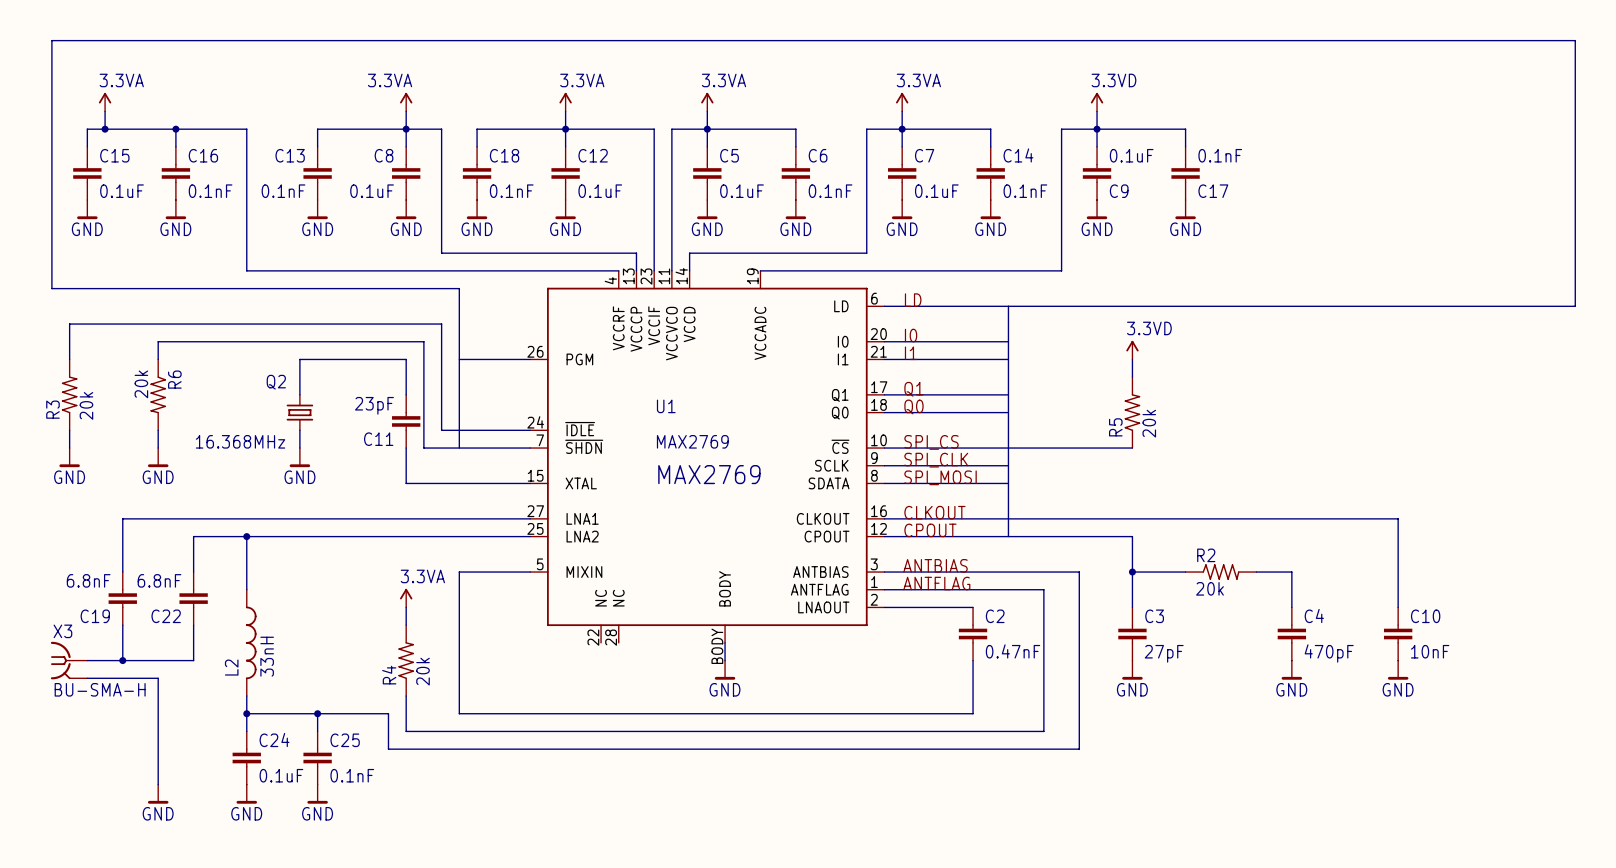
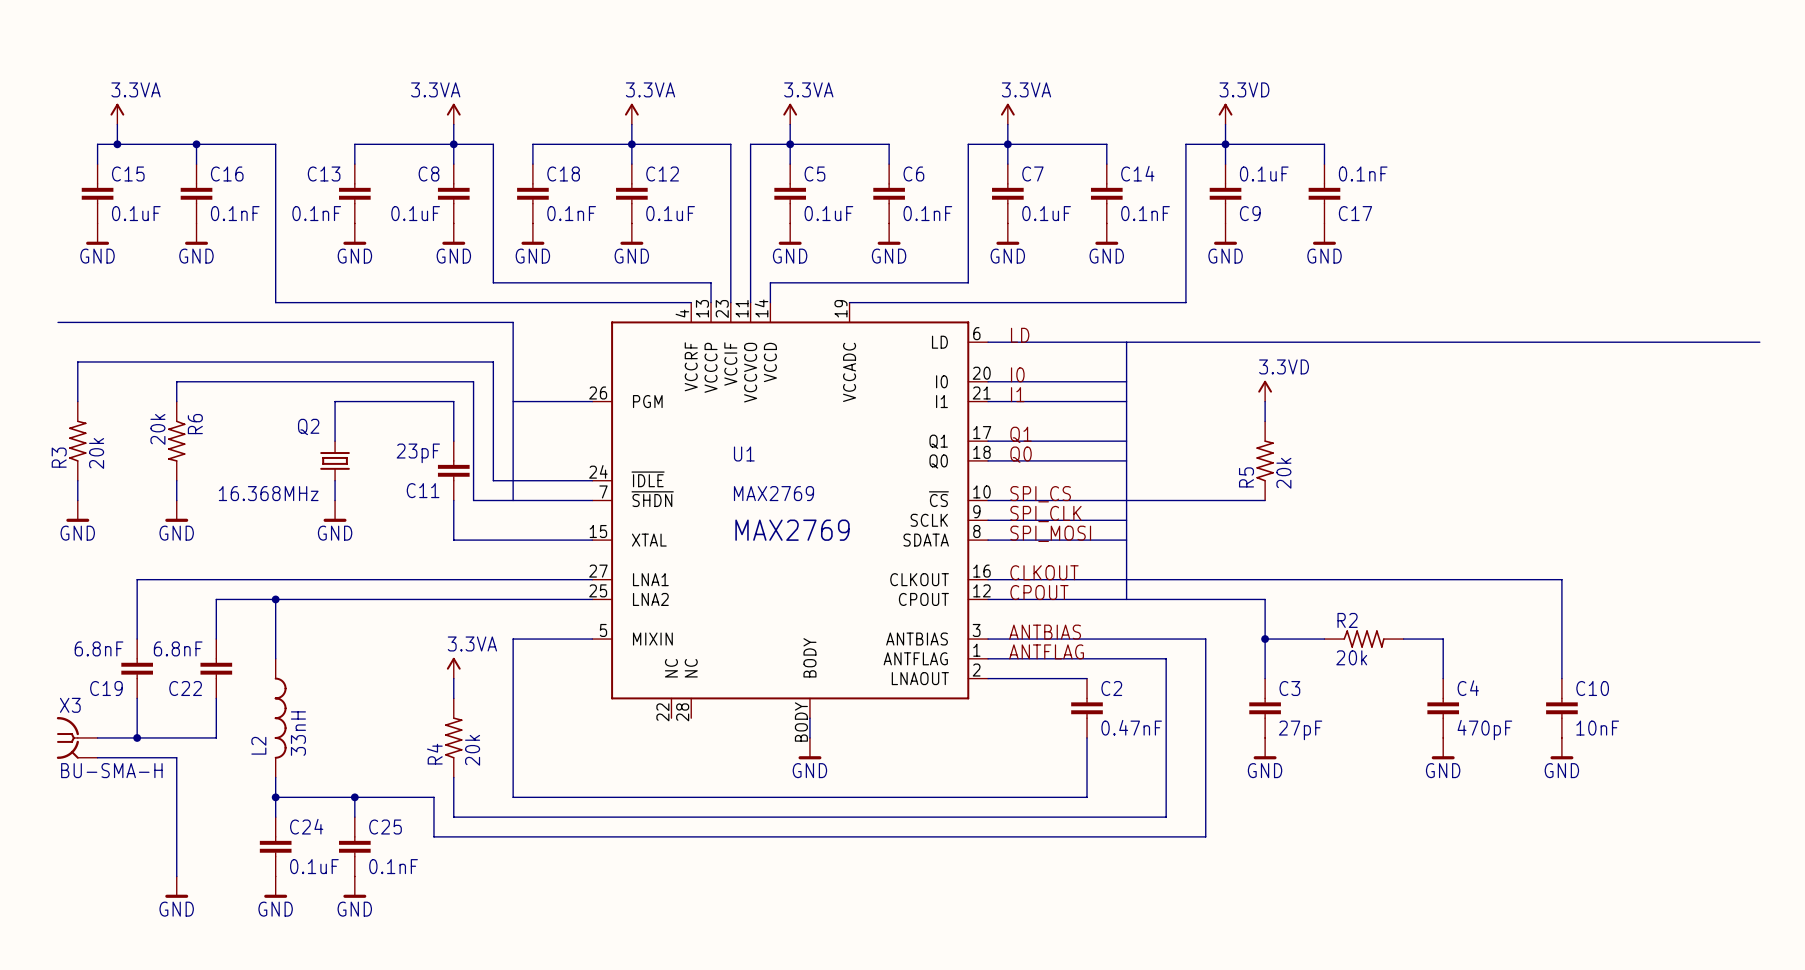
bus: (51, 288) (51, 40) (1575, 40) (1575, 306) -> none

